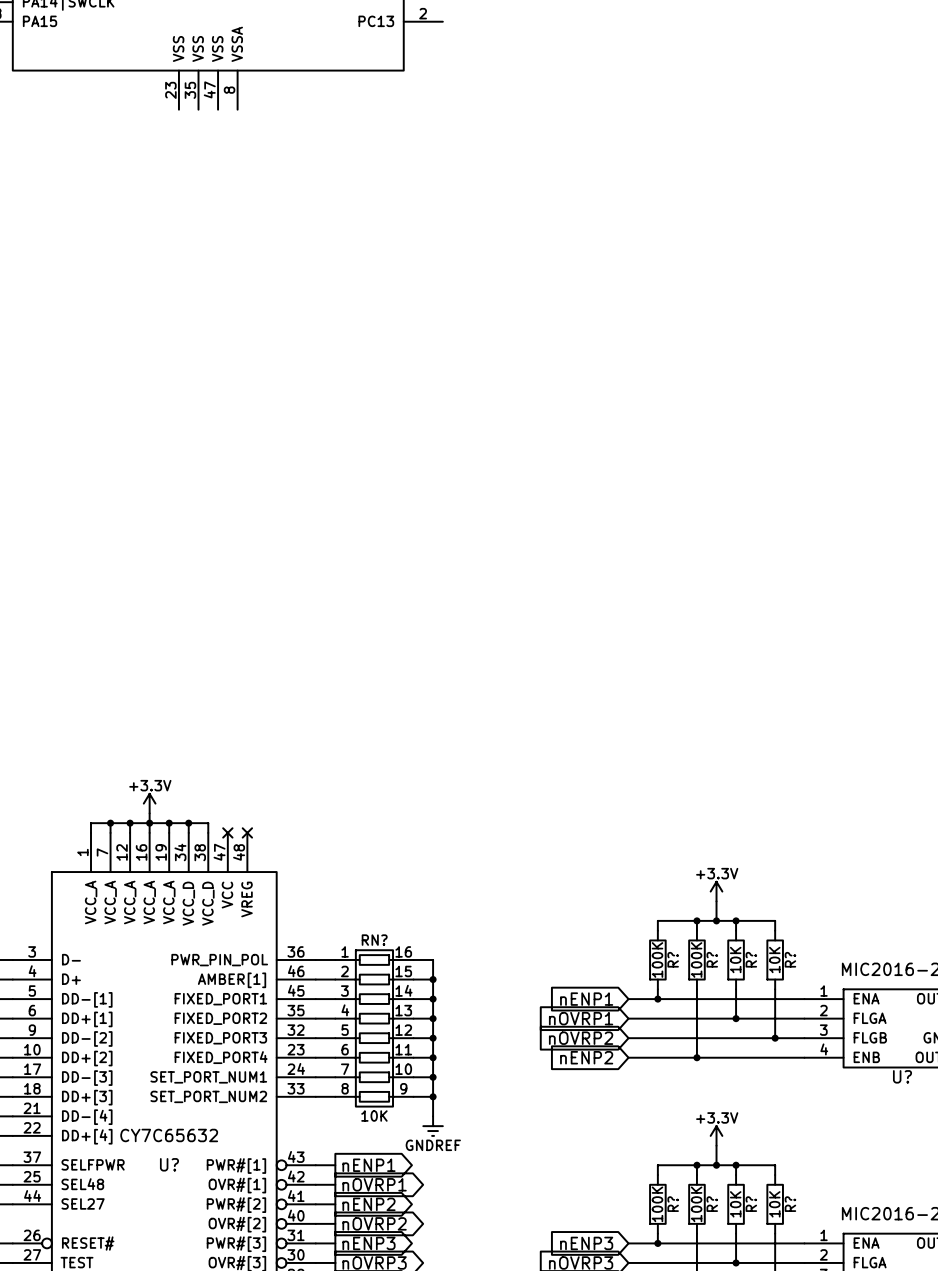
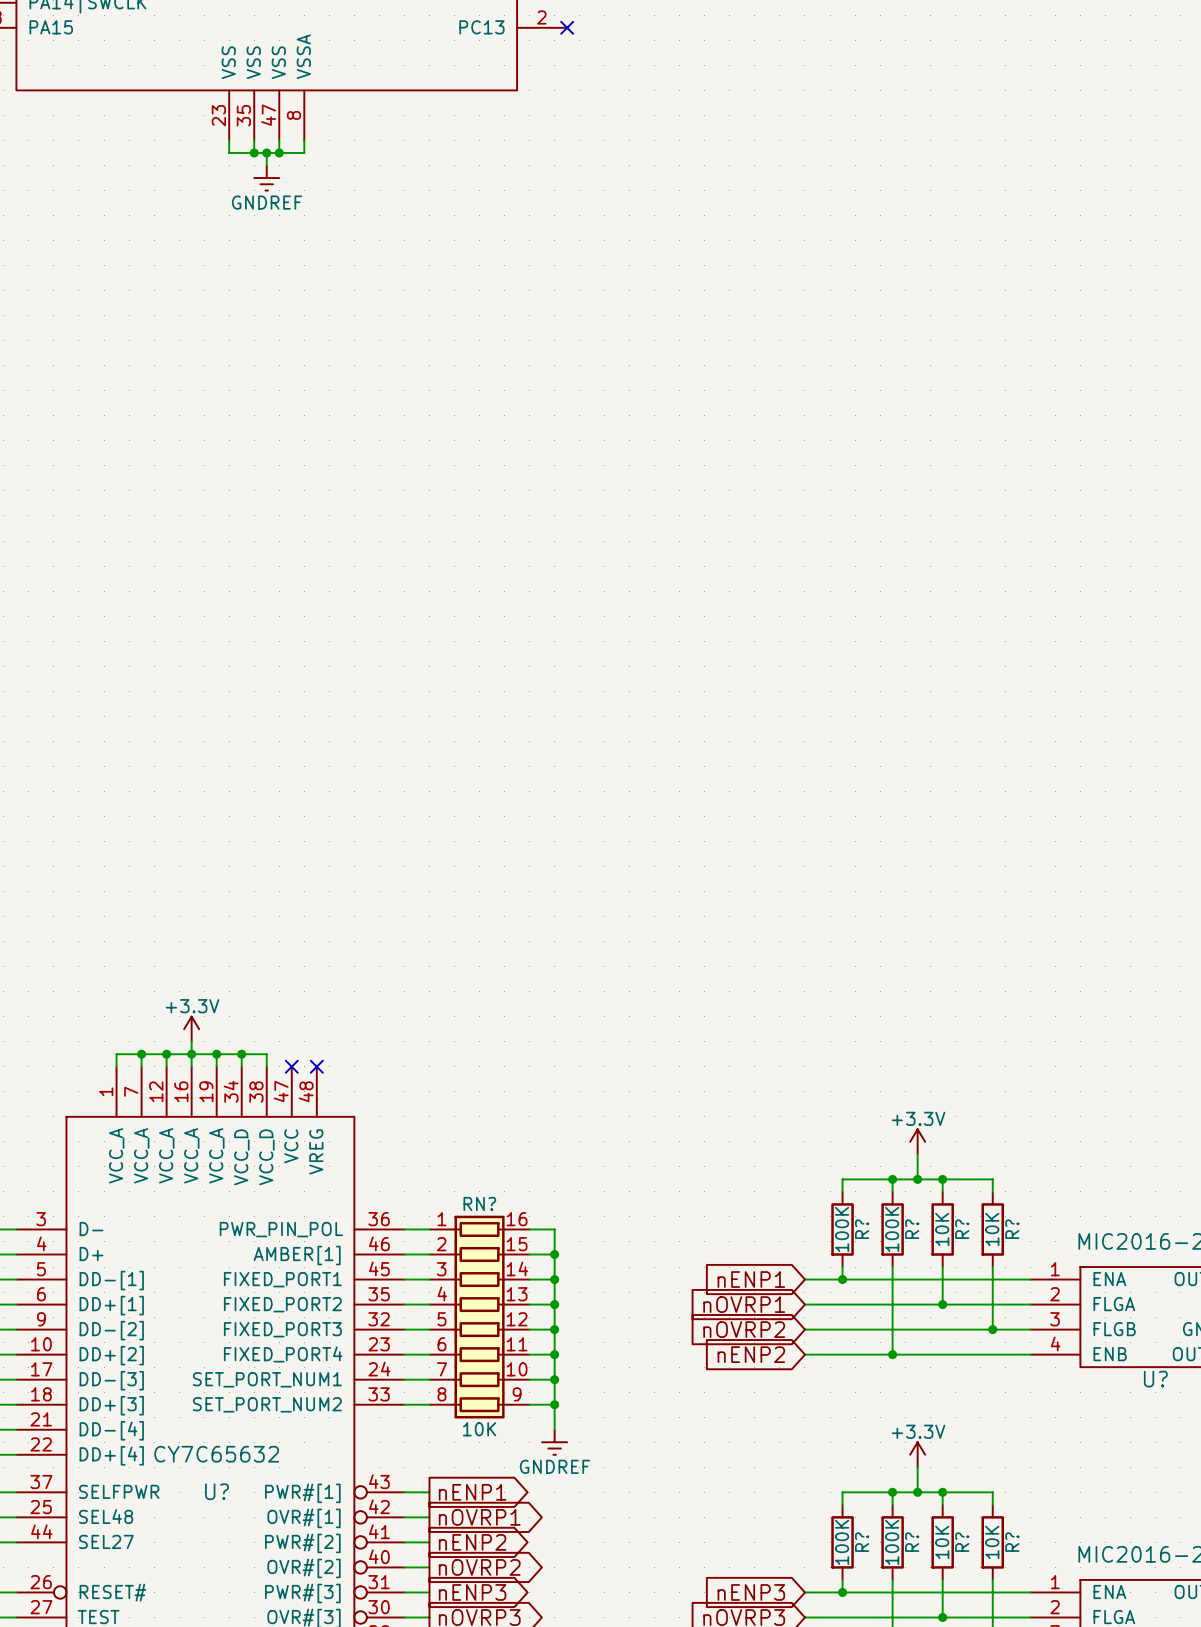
no-connect mark: none -> (567, 27)
wire: none -> (229, 140) (229, 152) (304, 152) (304, 140)
wire: none -> (254, 140) (254, 152)
wire: none -> (279, 140) (279, 152)
junction: none -> (254, 152)
wire: none -> (266, 152) (266, 165)
junction: none -> (266, 152)
junction: none -> (279, 152)
power symbol: none -> GNDREF (266, 178)

